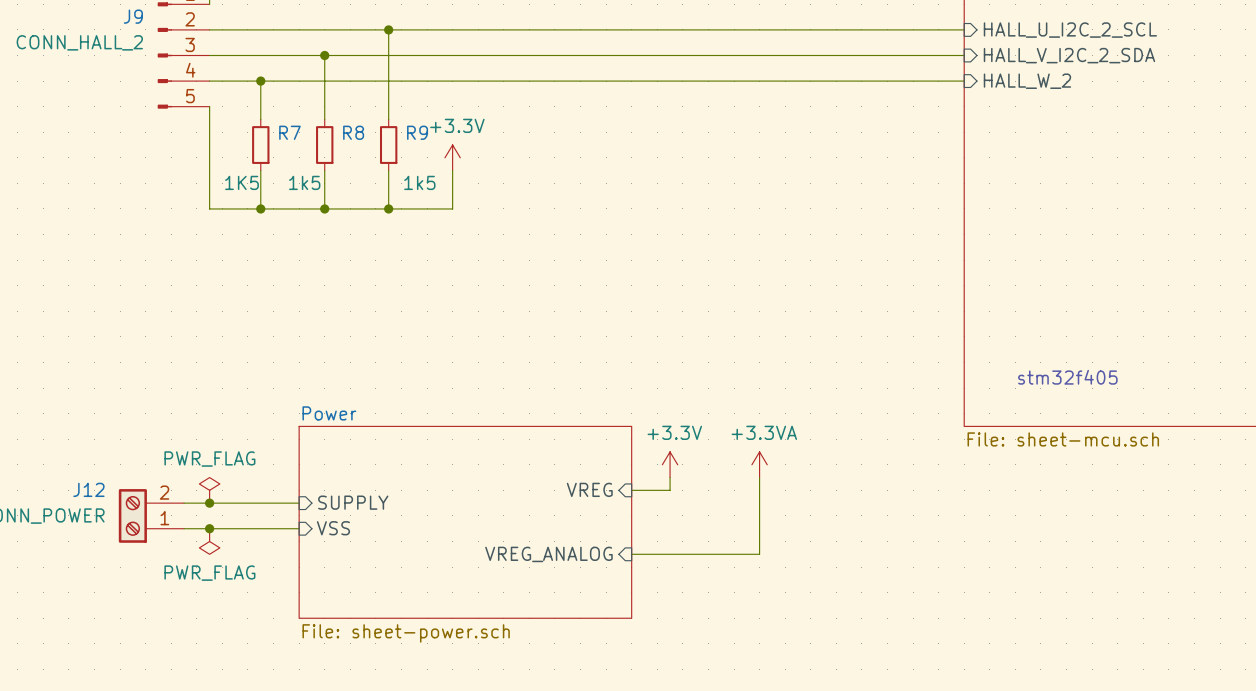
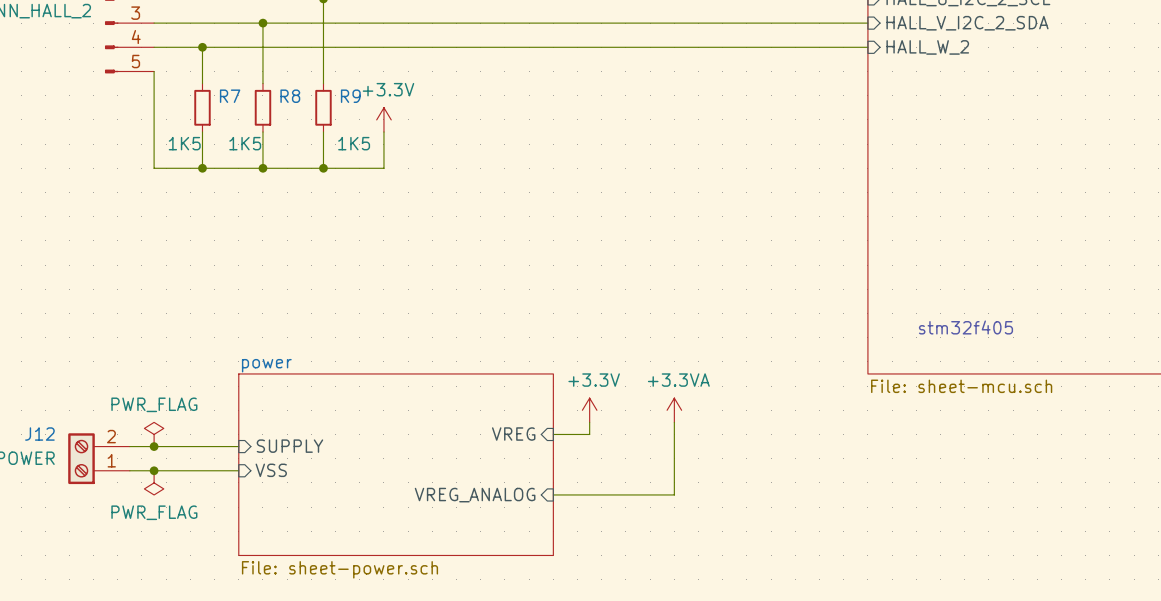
R8 value: 1k5 (304, 182) -> 1K5 (245, 143)
R9 value: 1k5 (419, 182) -> 1K5 (354, 143)
sheet Power name: Power (329, 413) -> power (266, 365)

